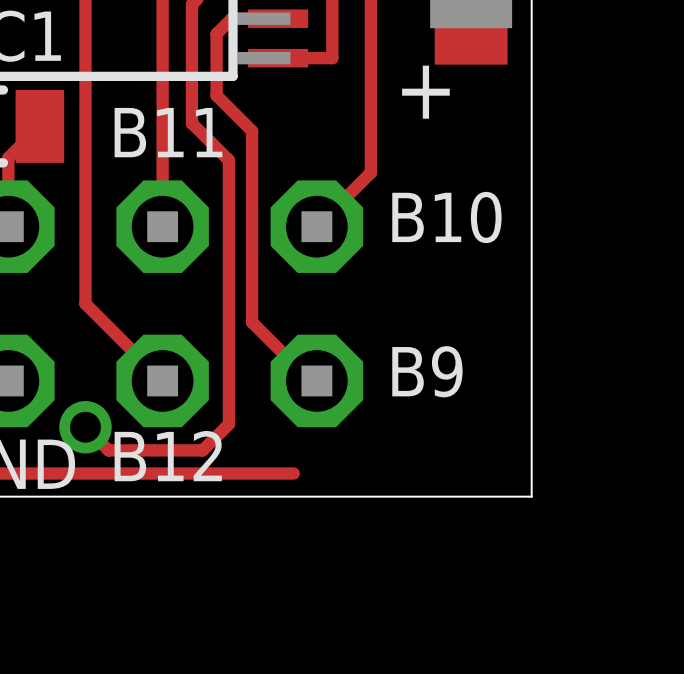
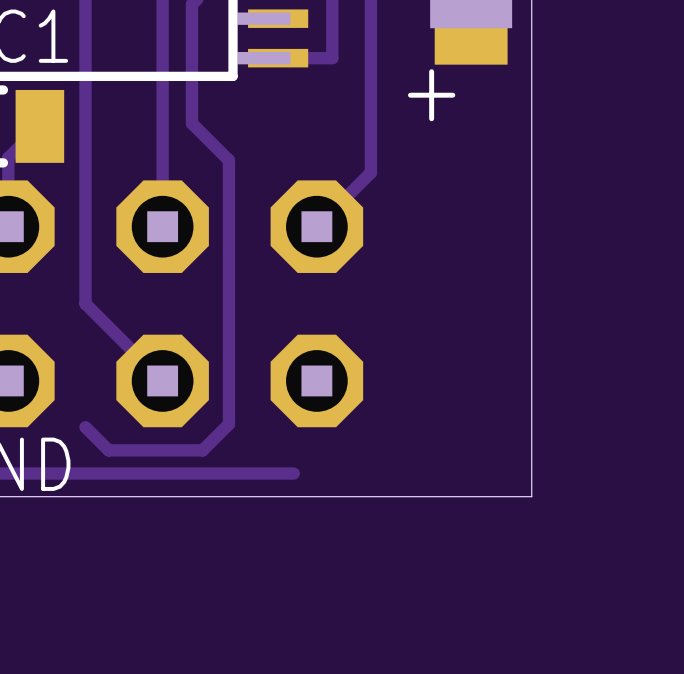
track: (278, 18) (231, 18) (216, 33) (216, 95) (252, 131) (252, 322) (310, 380) (316, 380) -> none
text: B11 (168, 132) -> none
text: B10 (446, 217) -> none
text: B9 (427, 371) -> none
via: (85, 427) -> none
text: B12 (168, 456) -> none

